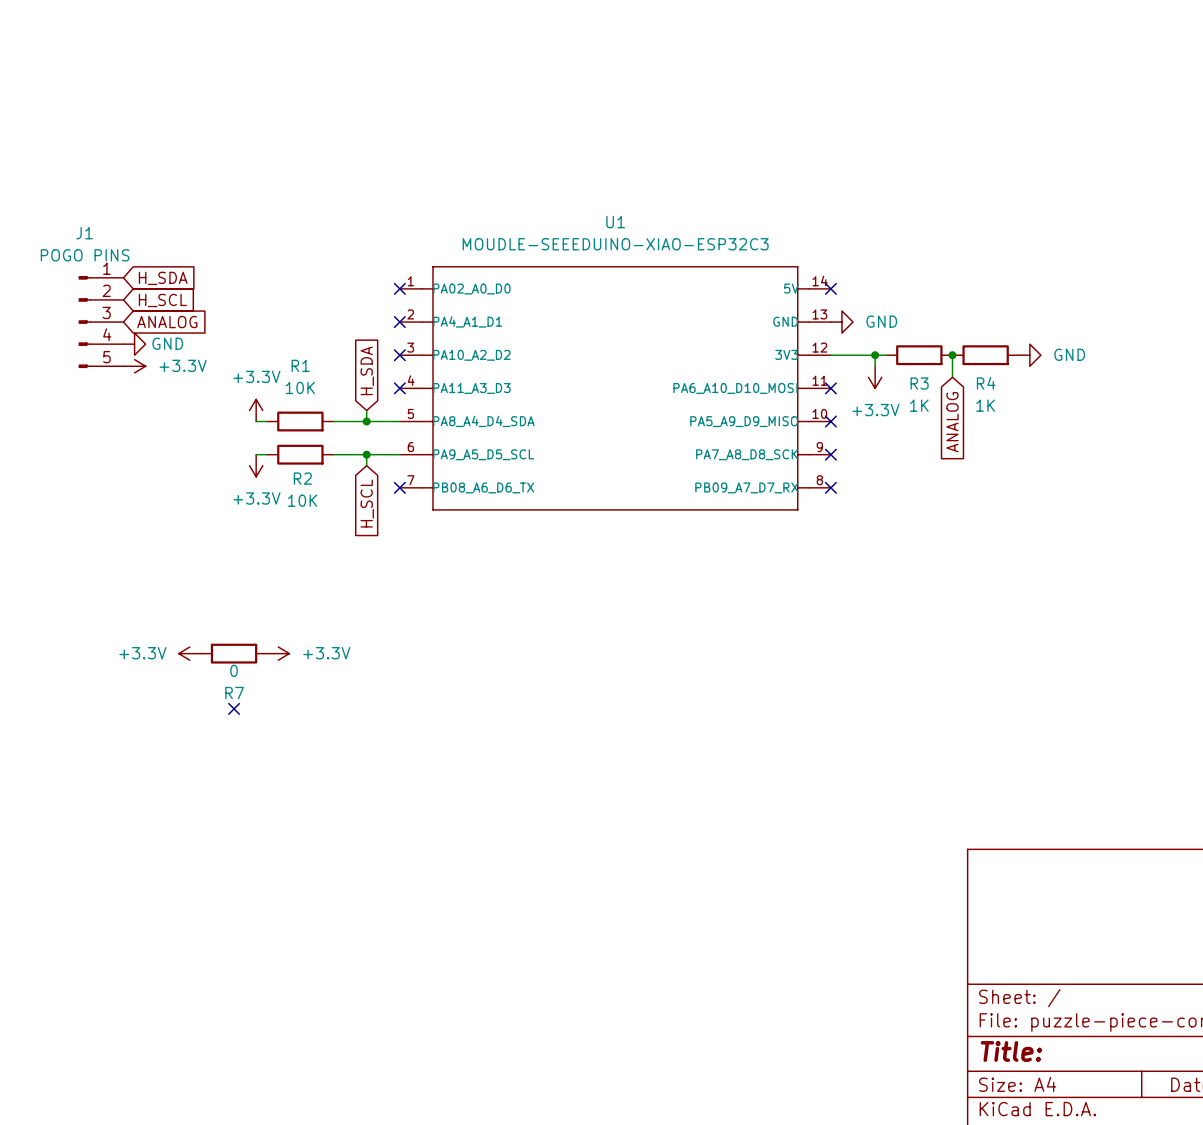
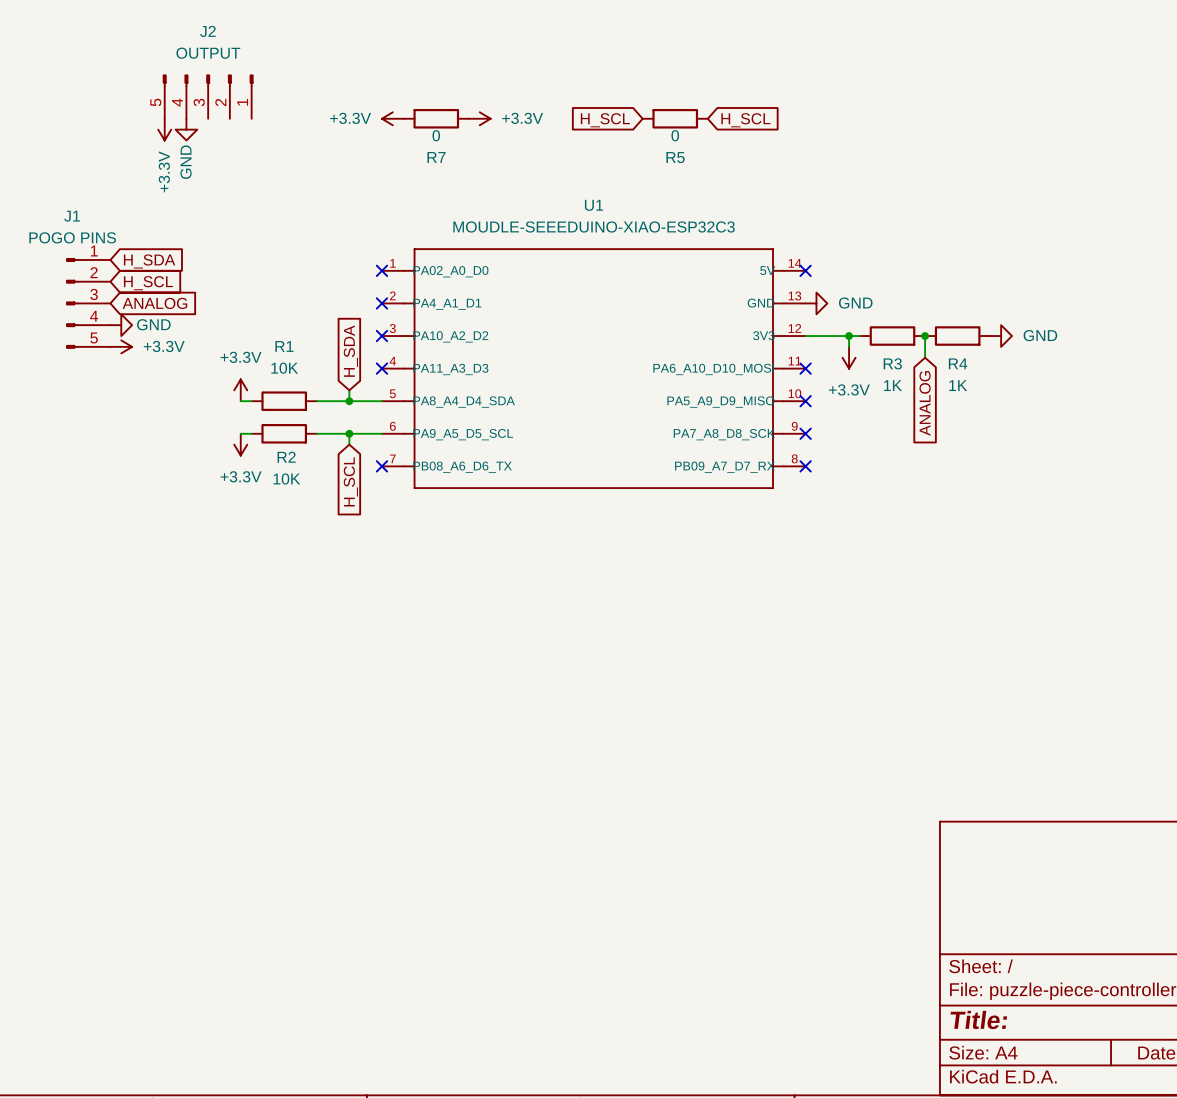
J2: none -> OUTPUT (208, 96)
power symbol: none -> +3.3V (392, 118)
power symbol: none -> +3.3V (479, 118)
global label: none -> H_SCL (605, 120)
R5: none -> 0 (675, 118)
global label: none -> H_SCL (745, 120)
power symbol: none -> +3.3V (164, 129)
power symbol: none -> GND (186, 129)
power symbol: +3.3V (189, 653) -> none
R7 position: (234, 653) -> (436, 118)
power symbol: +3.3V (278, 653) -> none
no-connect mark: (234, 708) -> none

